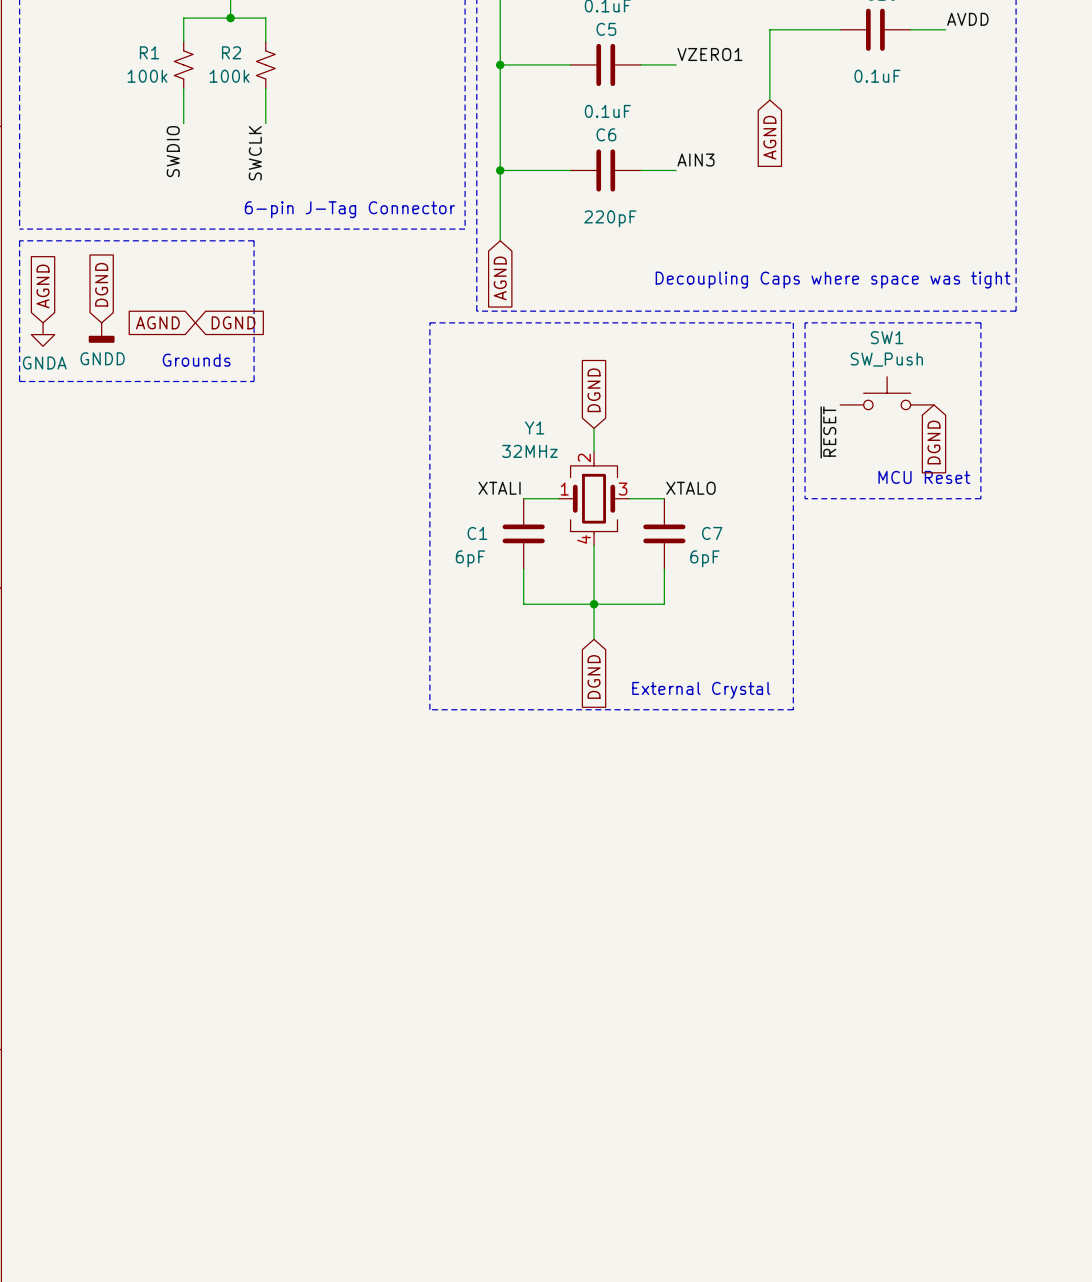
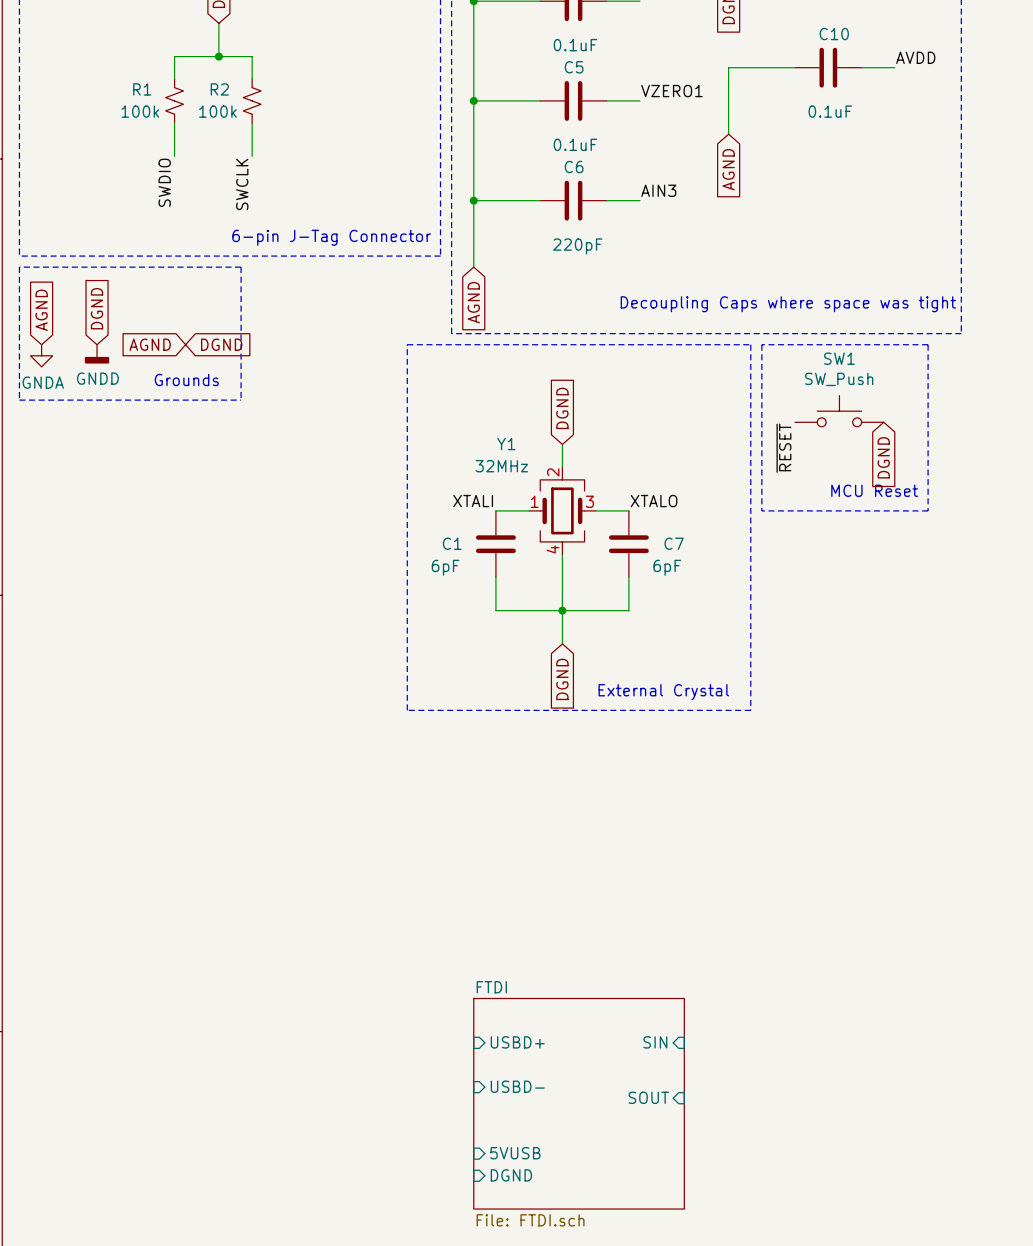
sheet pin: none -> USBD+ (517, 1042)
sheet pin: none -> SIN (655, 1042)
sheet pin: none -> USBD- (517, 1086)
sheet pin: none -> SOUT (648, 1097)
sheet FTDI: none -> File: FTDI.sch (579, 1103)
sheet pin: none -> 5VUSB (515, 1153)
sheet pin: none -> DGND (511, 1175)

